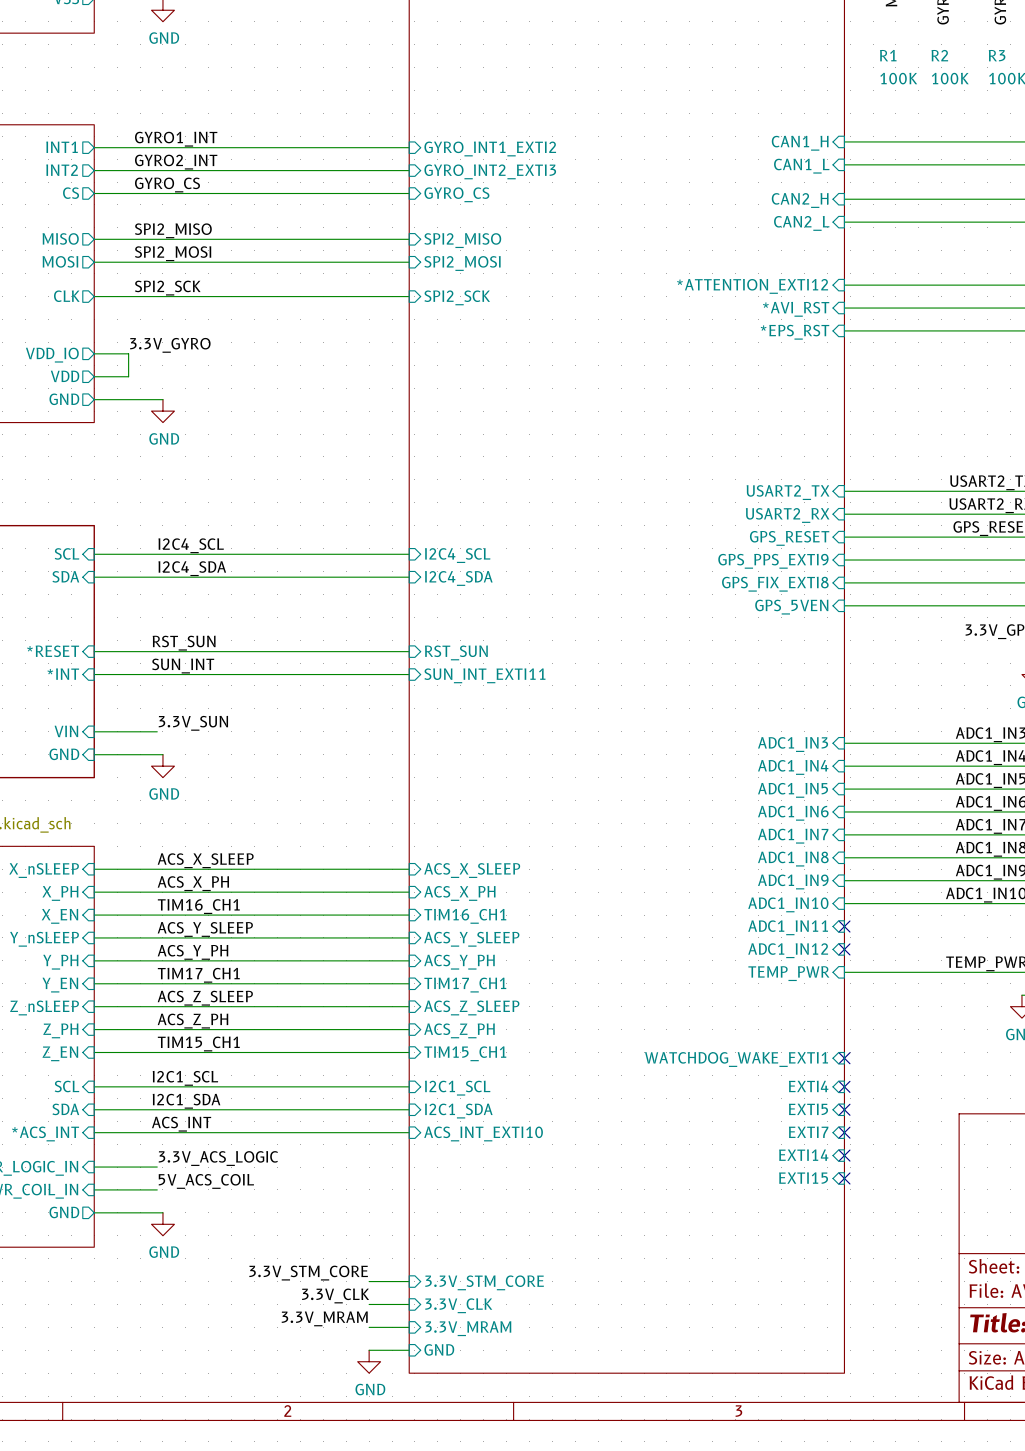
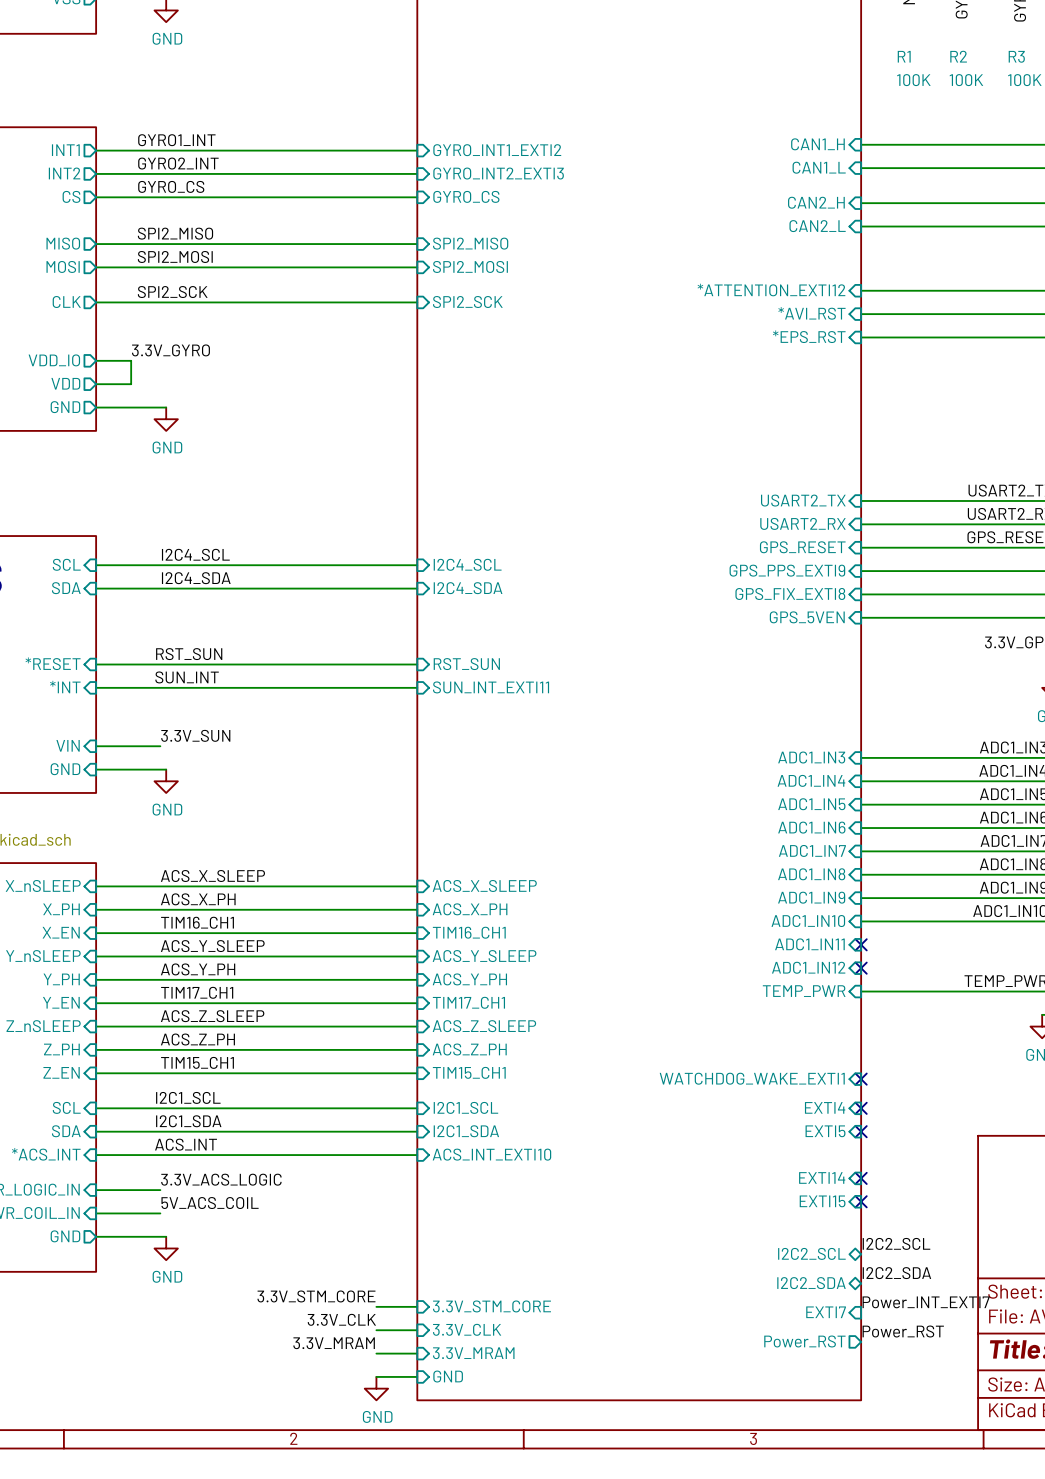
sheet pin position: EXTI7 (808, 1132) -> EXTI7 (826, 1312)
no-connect mark: (844, 1132) -> none
label: none -> I2C2_SCL (896, 1243)
sheet pin: none -> I2C2_SCL (811, 1253)
label: none -> I2C2_SDA (896, 1273)
sheet pin: none -> I2C2_SDA (811, 1283)
label: none -> Power_INT_EXTI7 (926, 1302)
label: none -> Power_RST (903, 1331)
sheet pin: none -> Power_RST (804, 1341)

